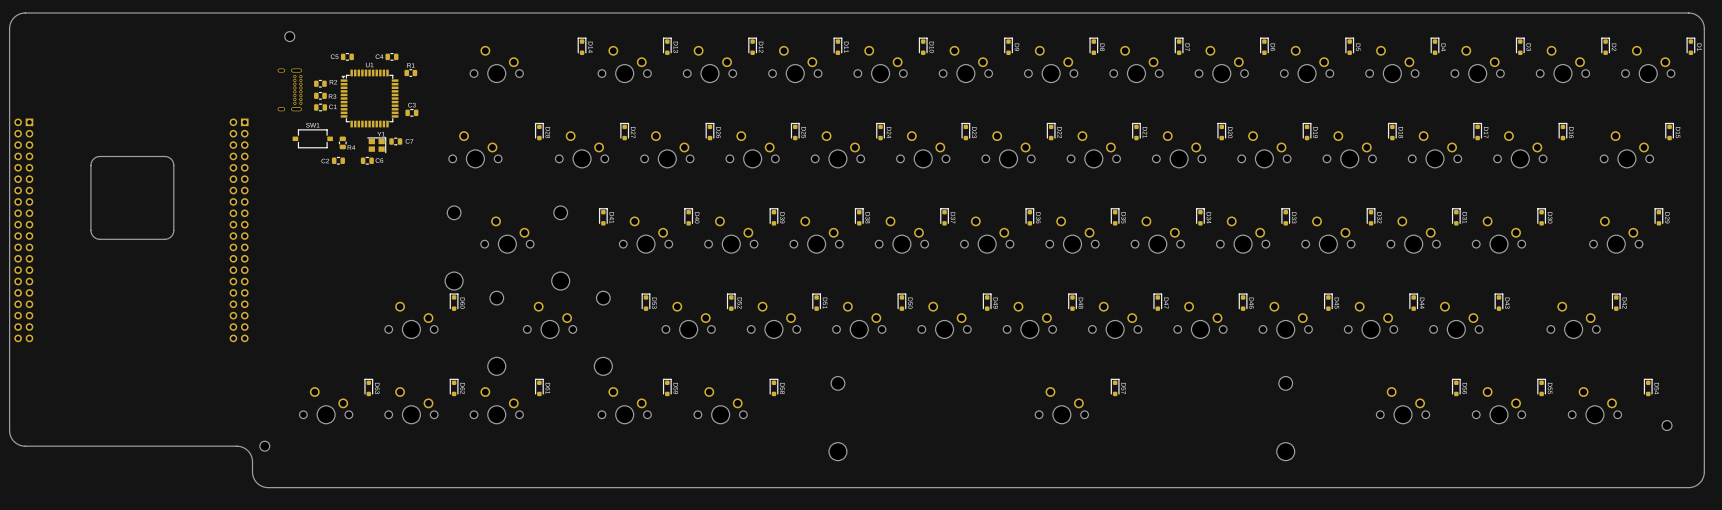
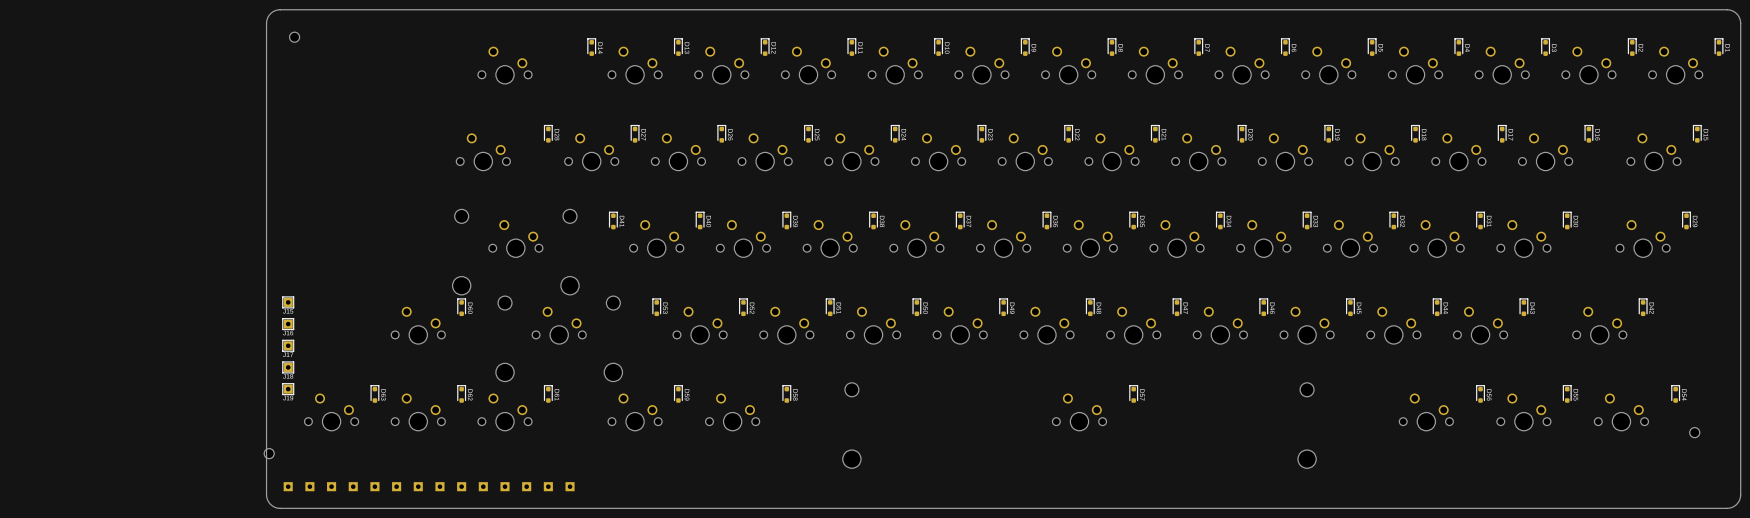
board edge: (1688, 13) (21, 13) (13, 18) (9, 28) (9, 434) (15, 442) (25, 446) (240, 446) (246, 449) (250, 455) (254, 480) (261, 486) (268, 487) (1692, 487) (1700, 481) (1704, 471) (1704, 28) (1699, 17) (1688, 13) -> (1727, 9) (1736, 13) (1740, 23) (1740, 494) (1737, 503) (1730, 507) (280, 508) (271, 505) (267, 498) (266, 23) (269, 15) (276, 10) (1727, 9)
part: (347, 56) -> none
part: (391, 56) -> none
part: (410, 73) -> none
part: (320, 83) -> none
part: (290, 89) -> none
part: (320, 95) -> none
part: (369, 98) -> none
part: (320, 107) -> none
part: (411, 112) -> none
part: (312, 138) -> none
part: (395, 141) -> none
part: (342, 142) -> none
part: (376, 145) -> none
board edge: (164, 156) (99, 156) (92, 159) (90, 165) (90, 230) (94, 237) (99, 239) (164, 239) (171, 235) (173, 230) (173, 164) (171, 159) (164, 156) -> none
part: (338, 160) -> none
part: (367, 160) -> none
part: (23, 230) -> none
part: (239, 230) -> none
part: none -> (288, 302)
part: none -> (288, 324)
part: none -> (288, 345)
part: none -> (288, 367)
part: none -> (288, 389)
part: none -> (288, 486)
part: none -> (309, 486)
part: none -> (331, 486)
part: none -> (353, 486)
part: none -> (374, 486)
part: none -> (396, 486)
part: none -> (418, 486)
part: none -> (439, 486)
part: none -> (461, 486)
part: none -> (483, 486)
part: none -> (505, 486)
part: none -> (526, 486)
part: none -> (548, 486)
part: none -> (570, 486)

